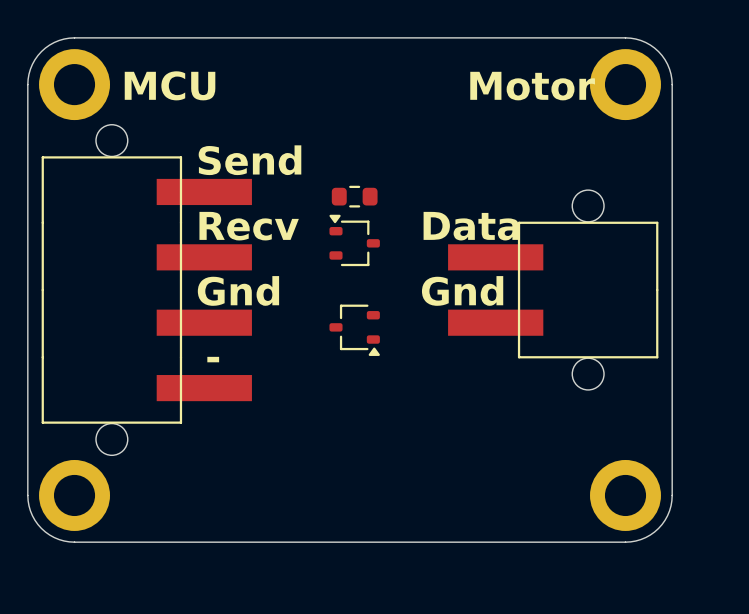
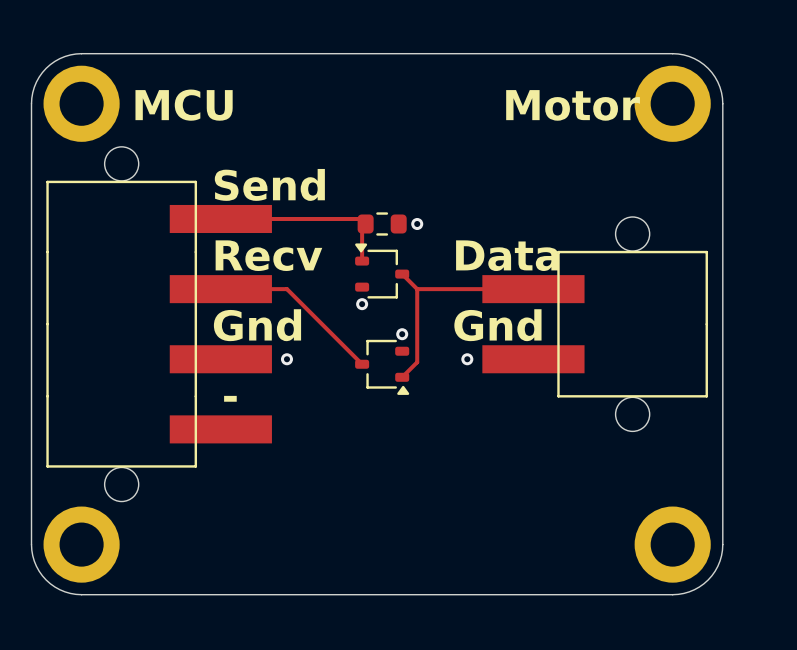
track: none -> (220, 218) (360, 218) (365, 224) (362, 227) (362, 261)
via: none -> (417, 224)
track: none -> (402, 274) (417, 289)
track: none -> (220, 289) (286, 289) (362, 364)
track: none -> (417, 289) (533, 289)
track: none -> (417, 289) (417, 362) (402, 377)
via: none -> (362, 304)
via: none -> (402, 334)
via: none -> (286, 359)
via: none -> (467, 359)

